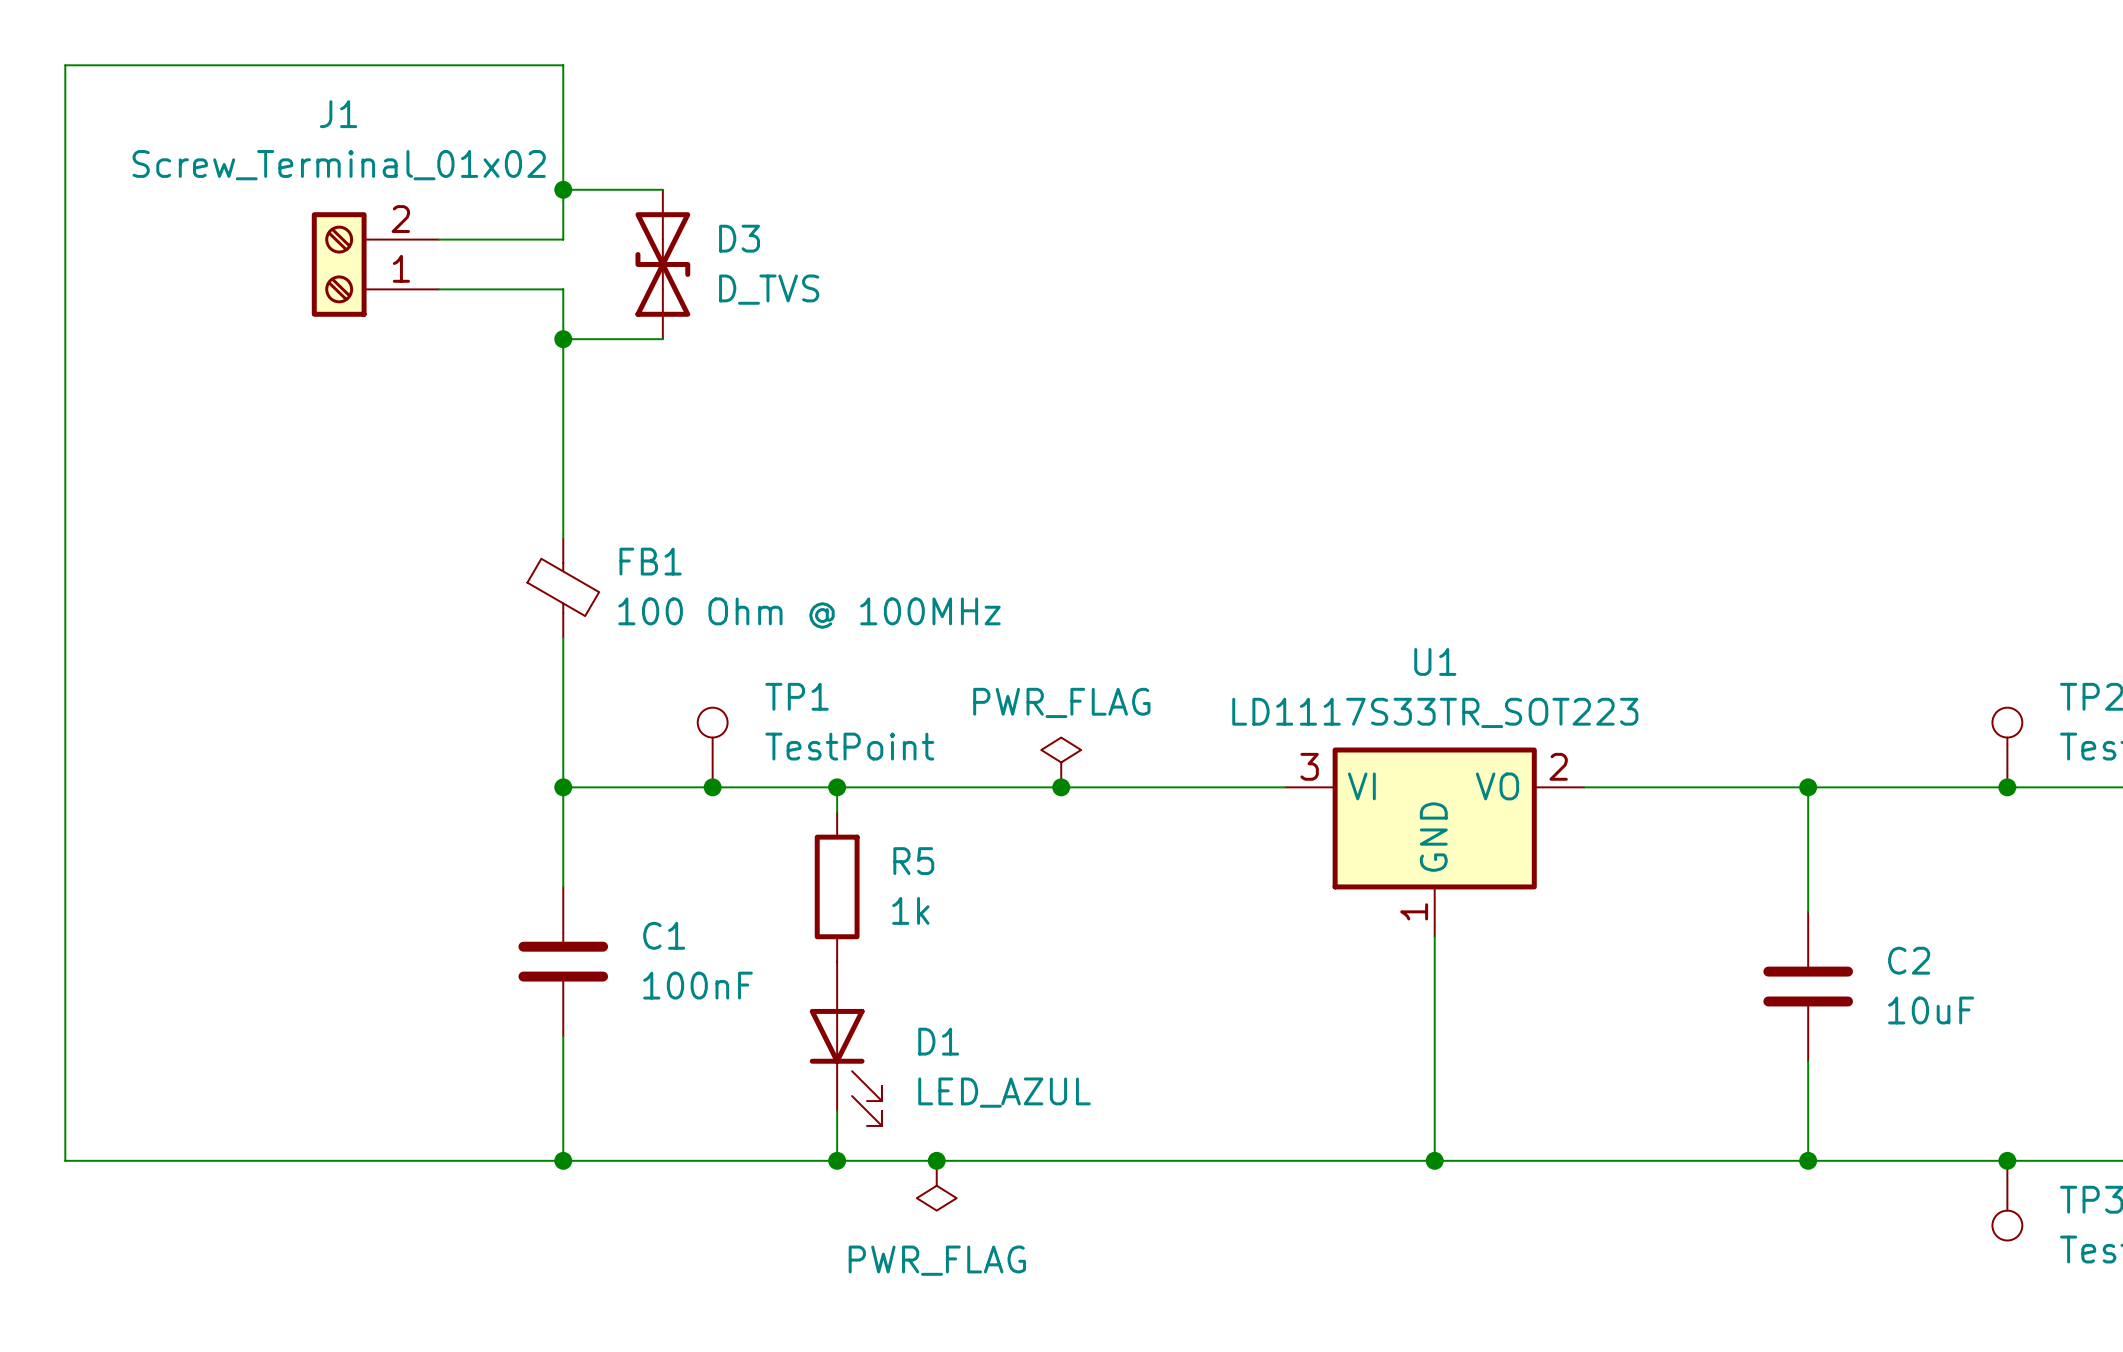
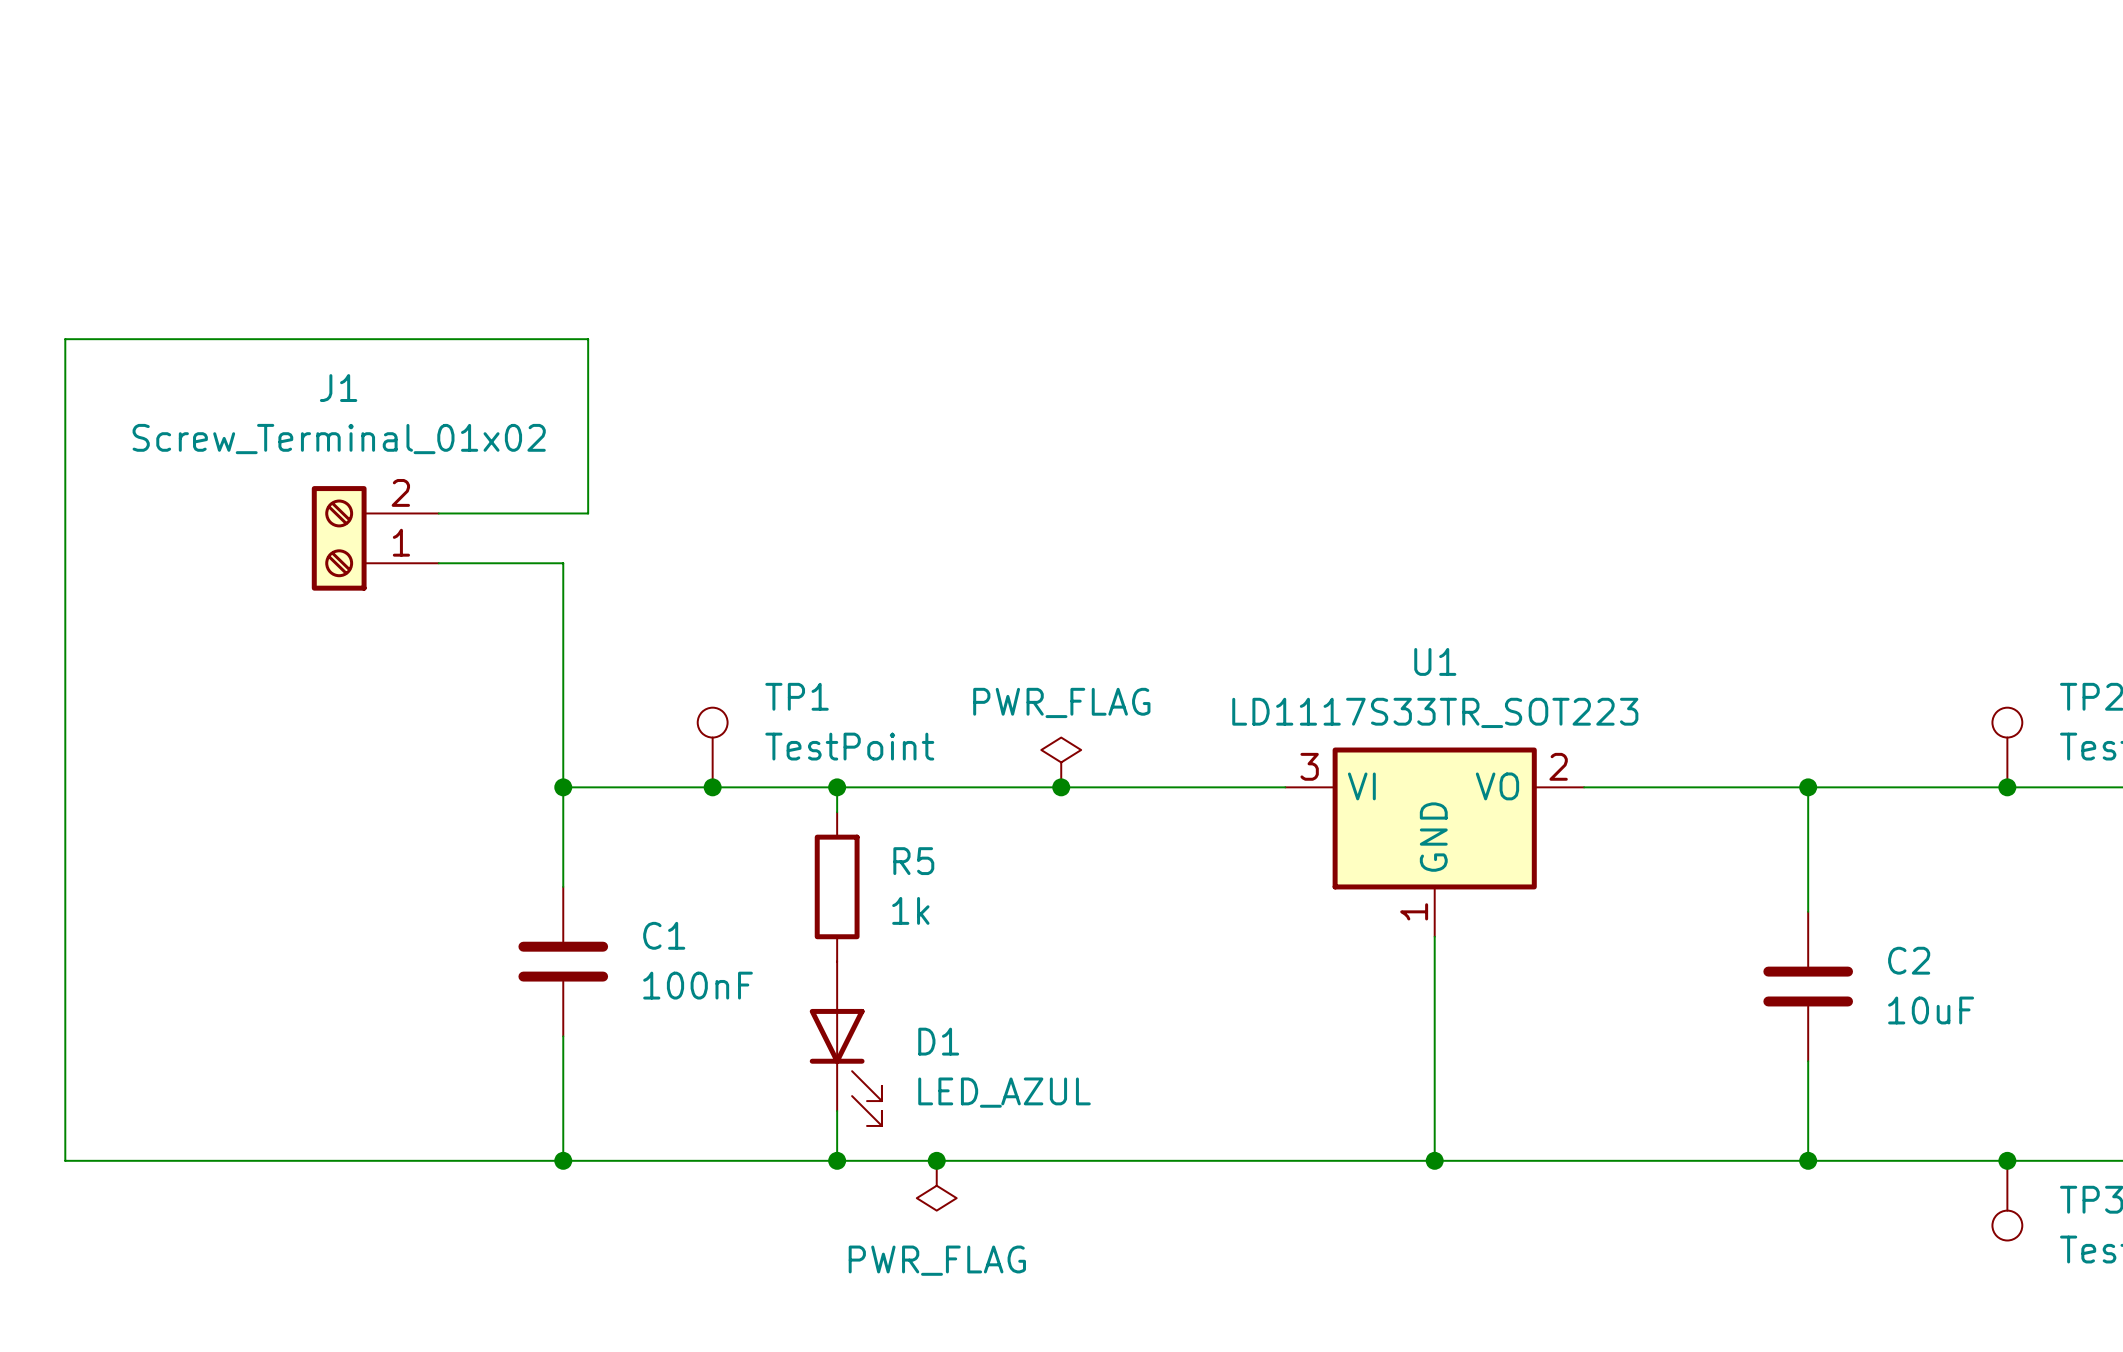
wire: (563, 189) (662, 189) -> none
junction: (563, 189) -> none
wire: (438, 239) (563, 239) (563, 65) (65, 65) (65, 339) -> (563, 339) (65, 339)
J1 position: (375, 264) -> (375, 538)
D3: D_TVS (662, 264) -> none
wire: (438, 289) (563, 289) (563, 538) -> none
junction: (563, 339) -> none
wire: (588, 339) (662, 339) -> (588, 339) (588, 513) (438, 513)
wire: none -> (438, 563) (563, 563) (563, 637)
FB1: 100 Ohm @ 100MHz (563, 588) -> none

